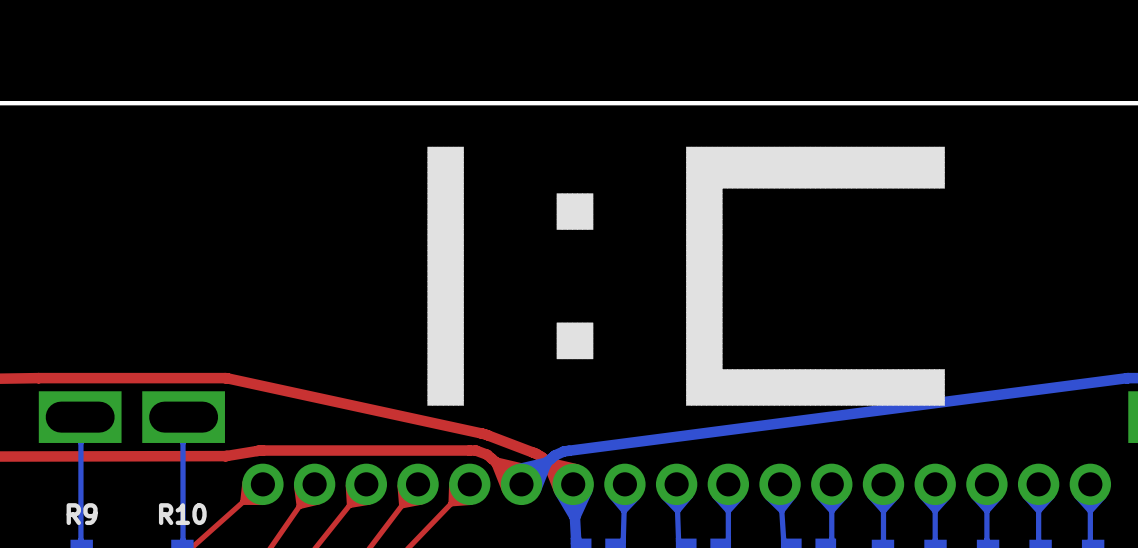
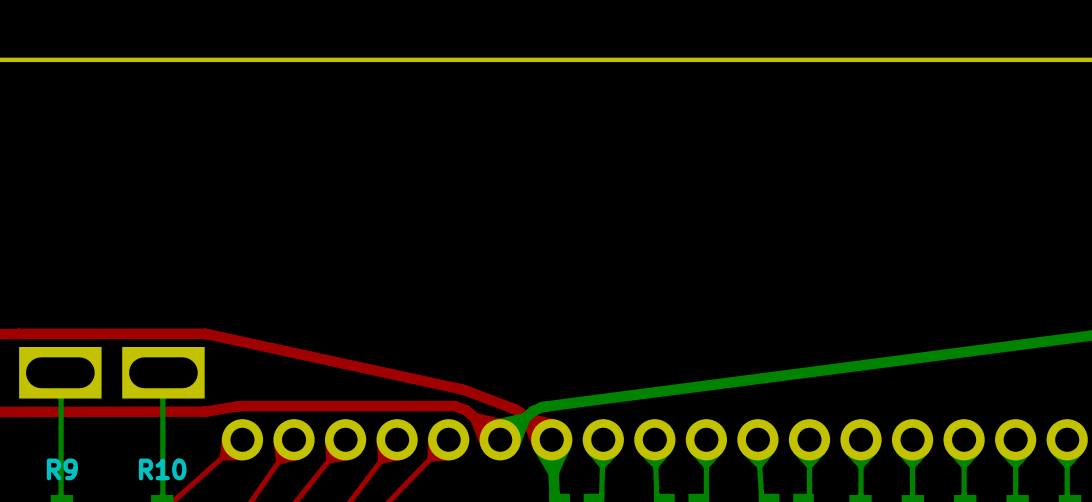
drawing: [427, 146, 945, 406] -> none

